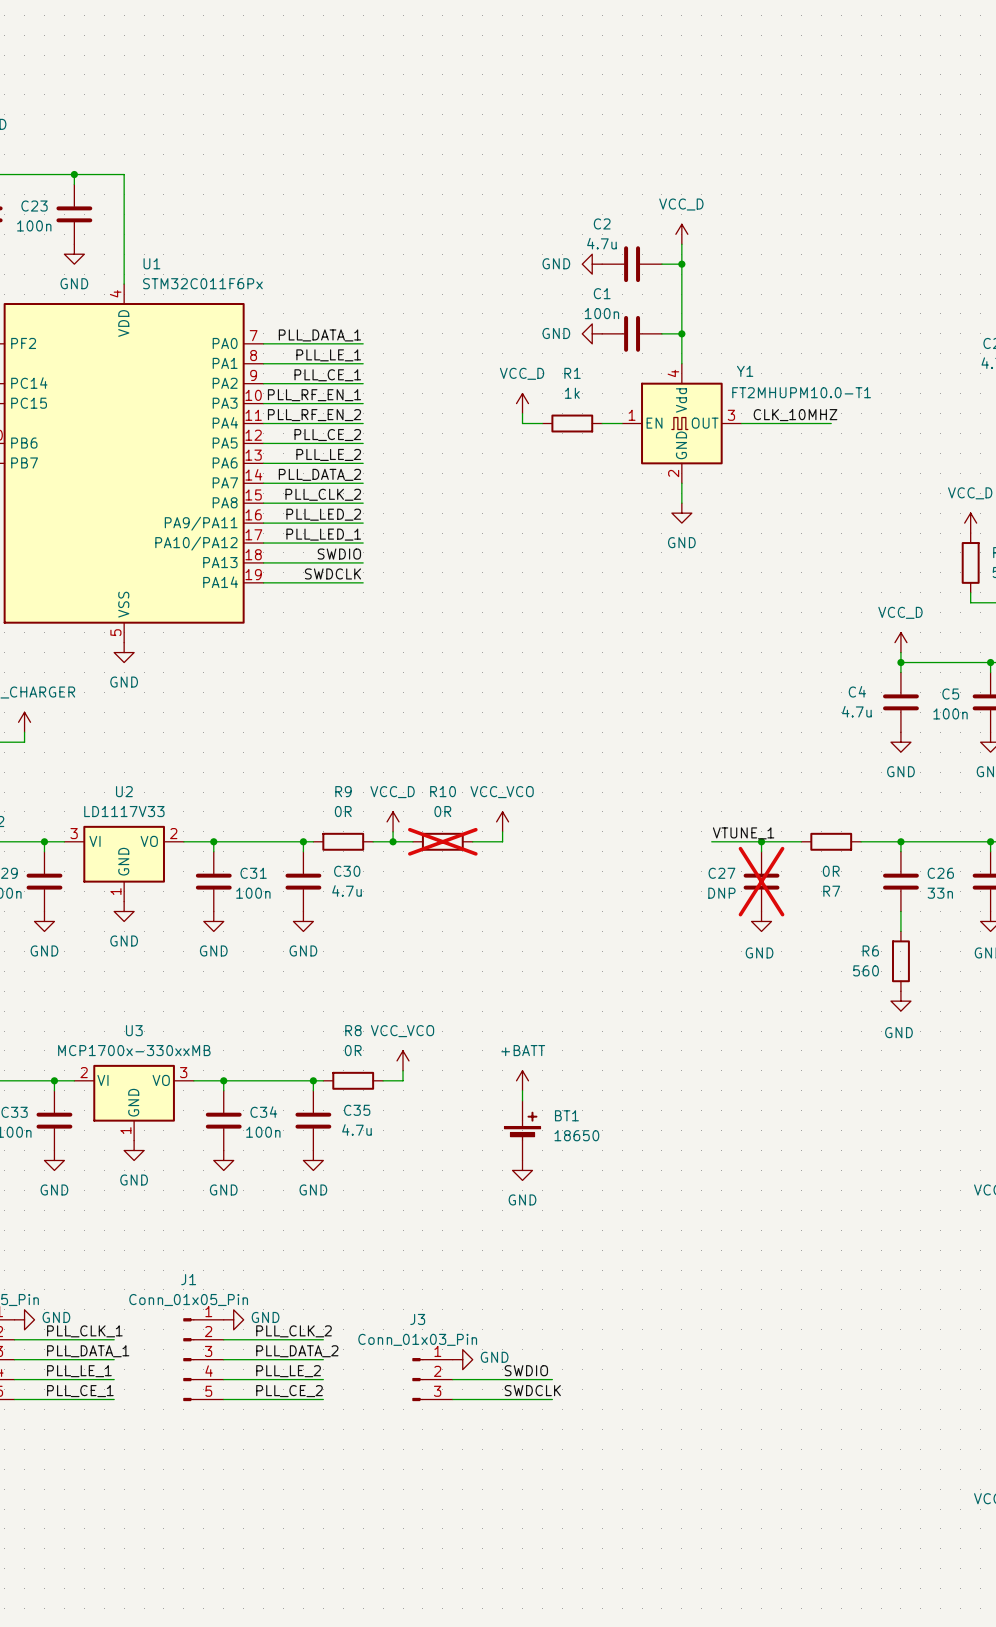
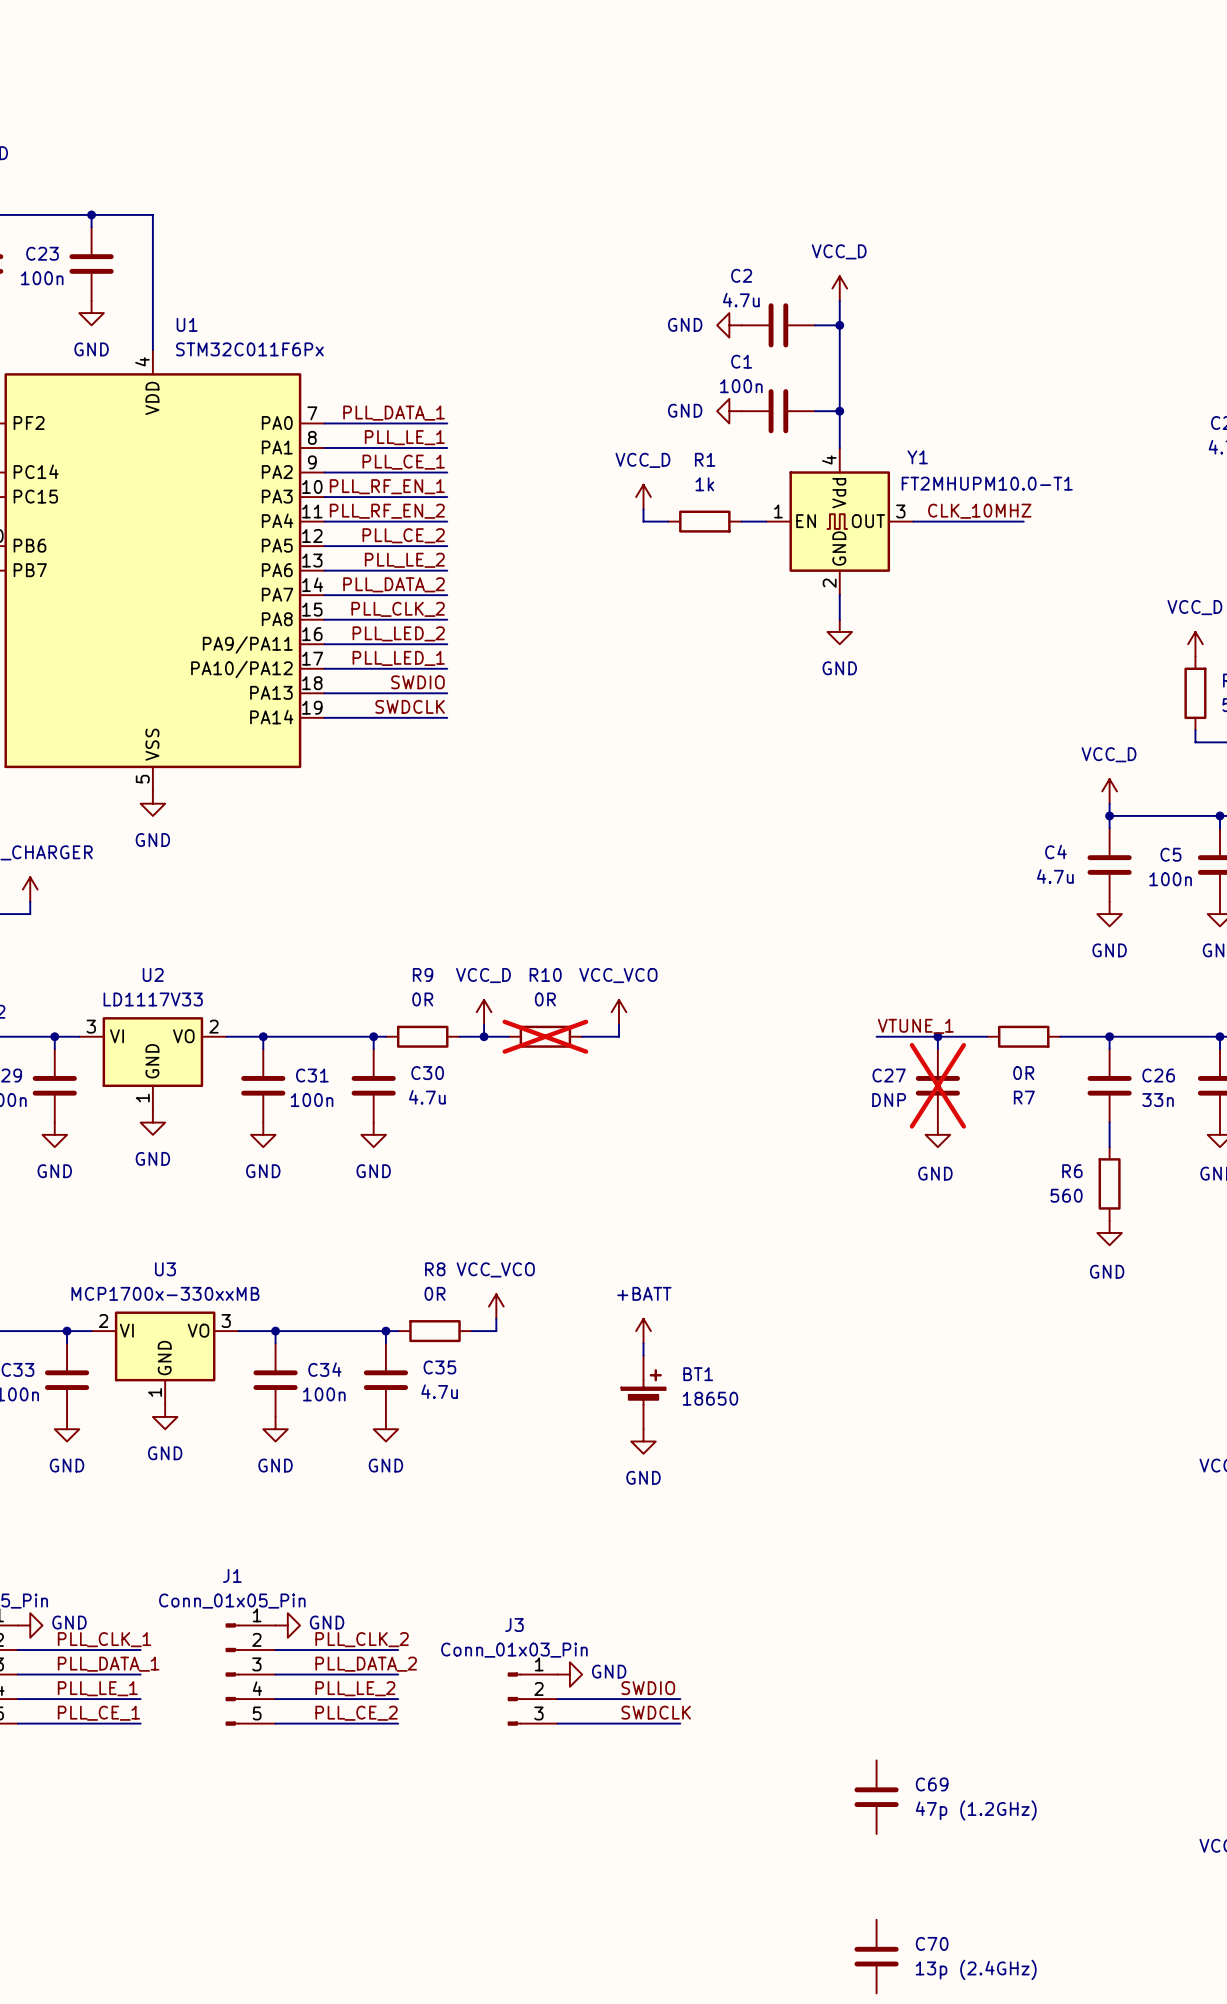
C69: none -> 47p (1.2GHz) (876, 1797)
C70: none -> 13p (2.4GHz) (876, 1956)

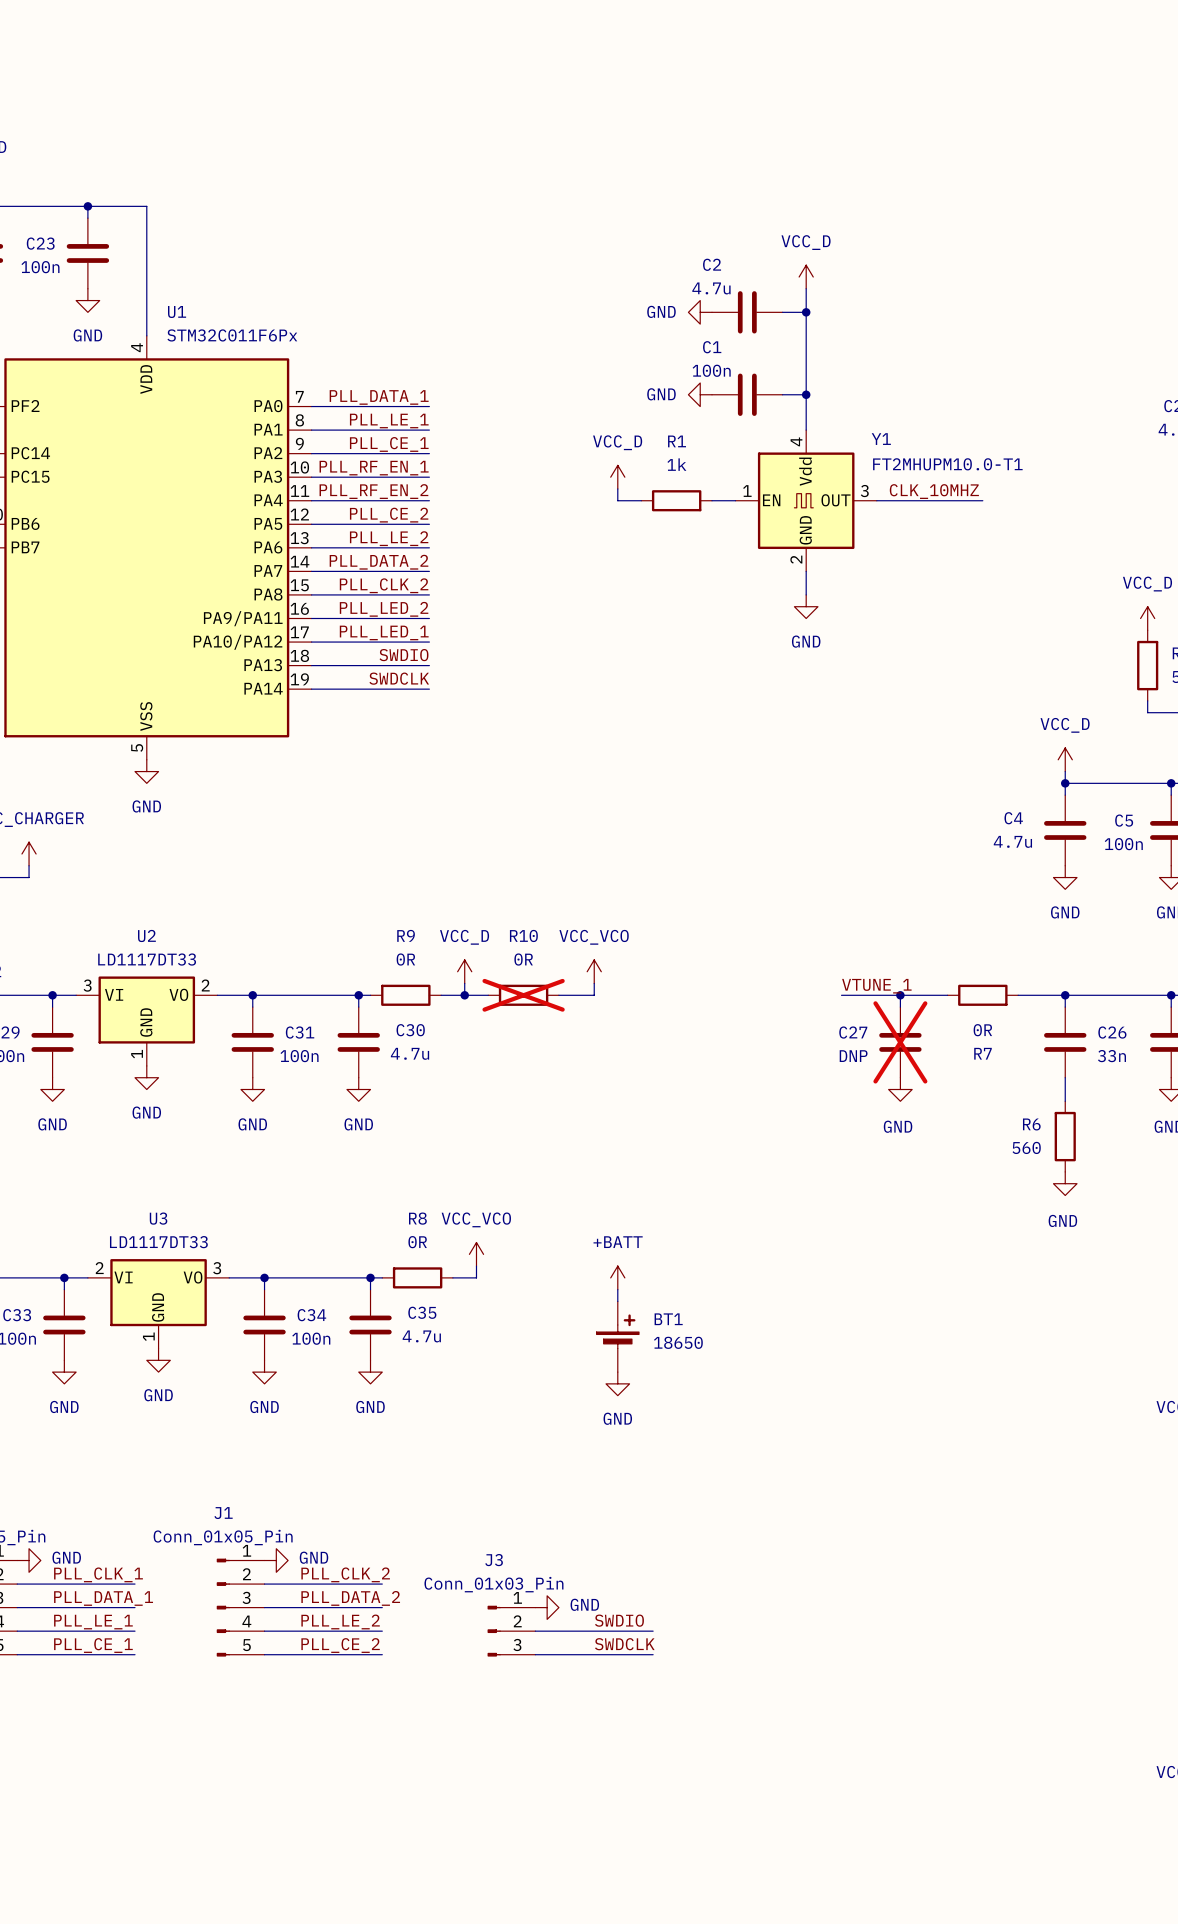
U2 value: LD1117V33 (153, 999) -> LD1117DT33 (147, 959)
U3 value: MCP1700x-330xxMB (165, 1293) -> LD1117DT33 (158, 1242)
C69: 47p (1.2GHz) (876, 1797) -> none
C70: 13p (2.4GHz) (876, 1956) -> none

